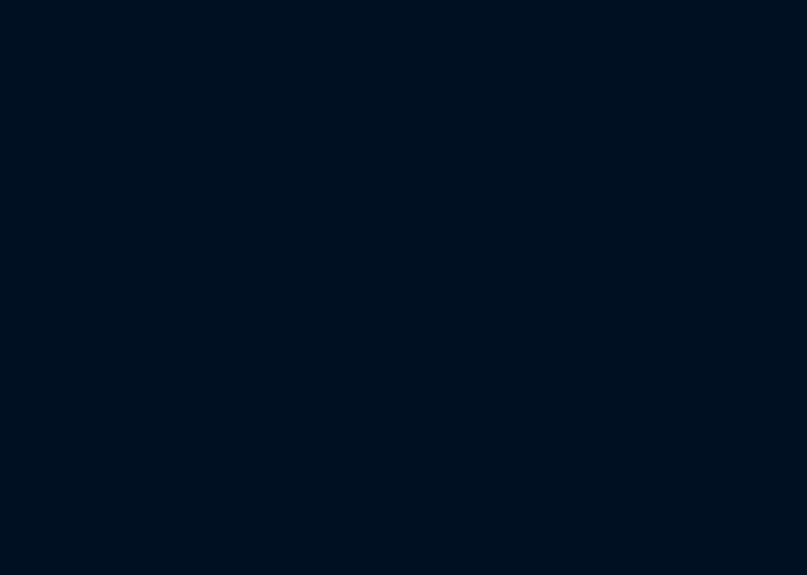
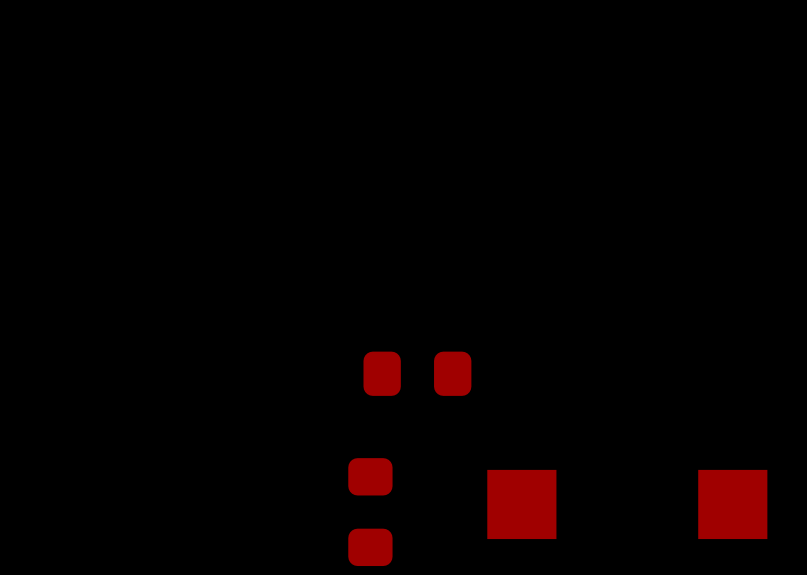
part: none -> (417, 373)
part: none -> (521, 504)
part: none -> (732, 504)
part: none -> (370, 512)

